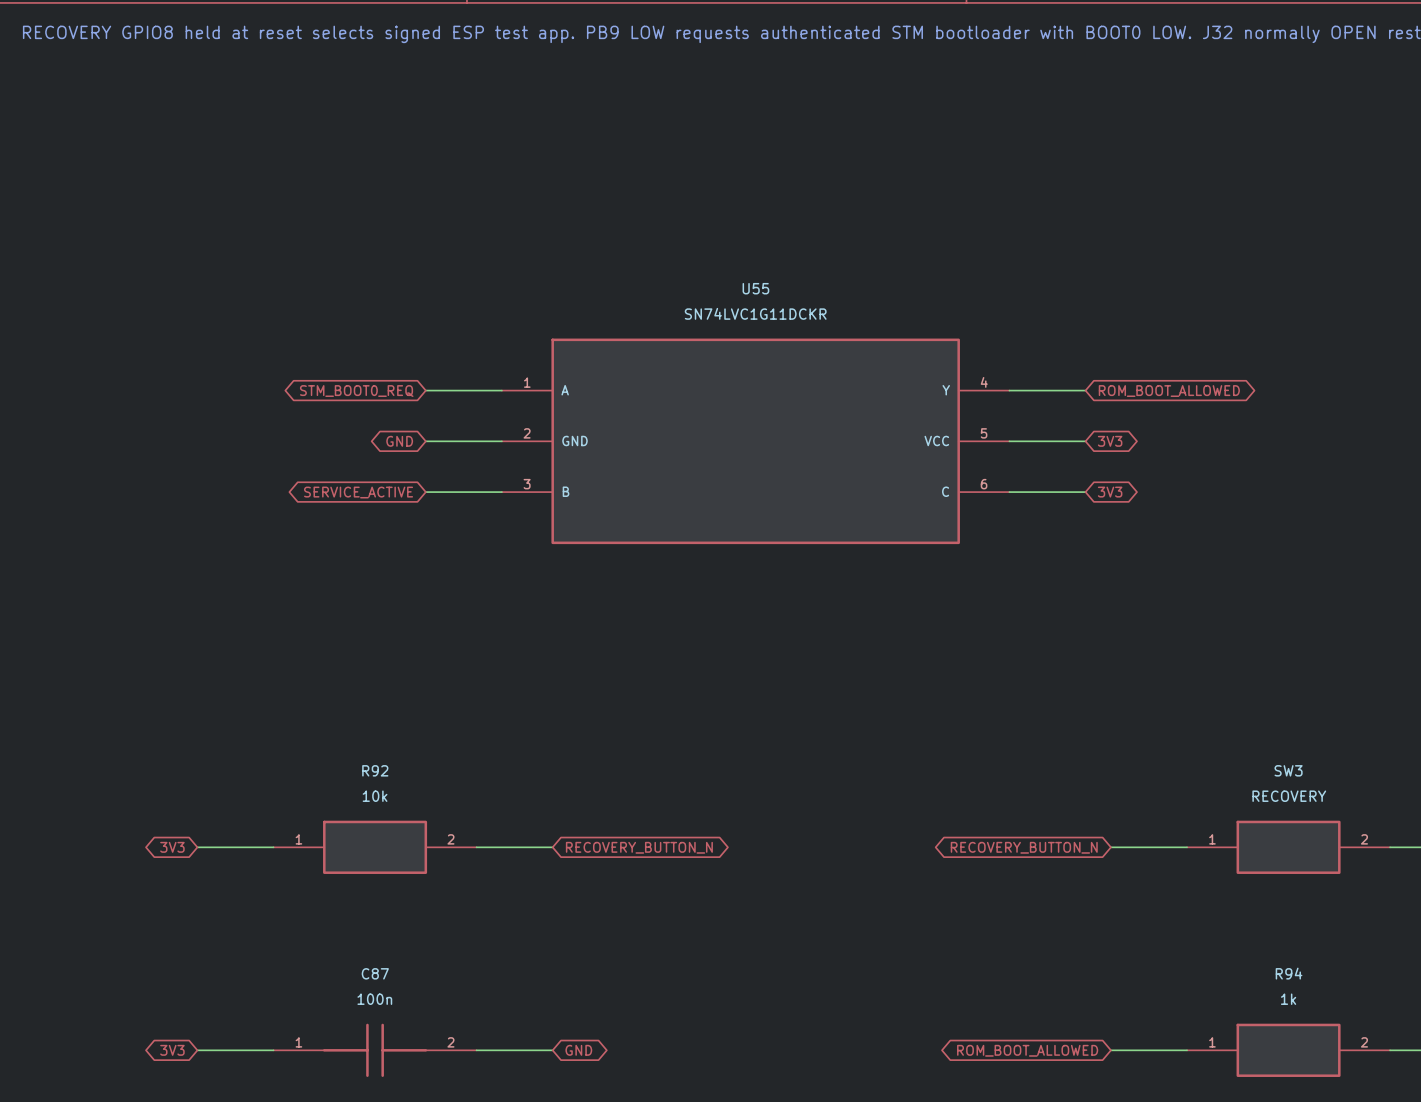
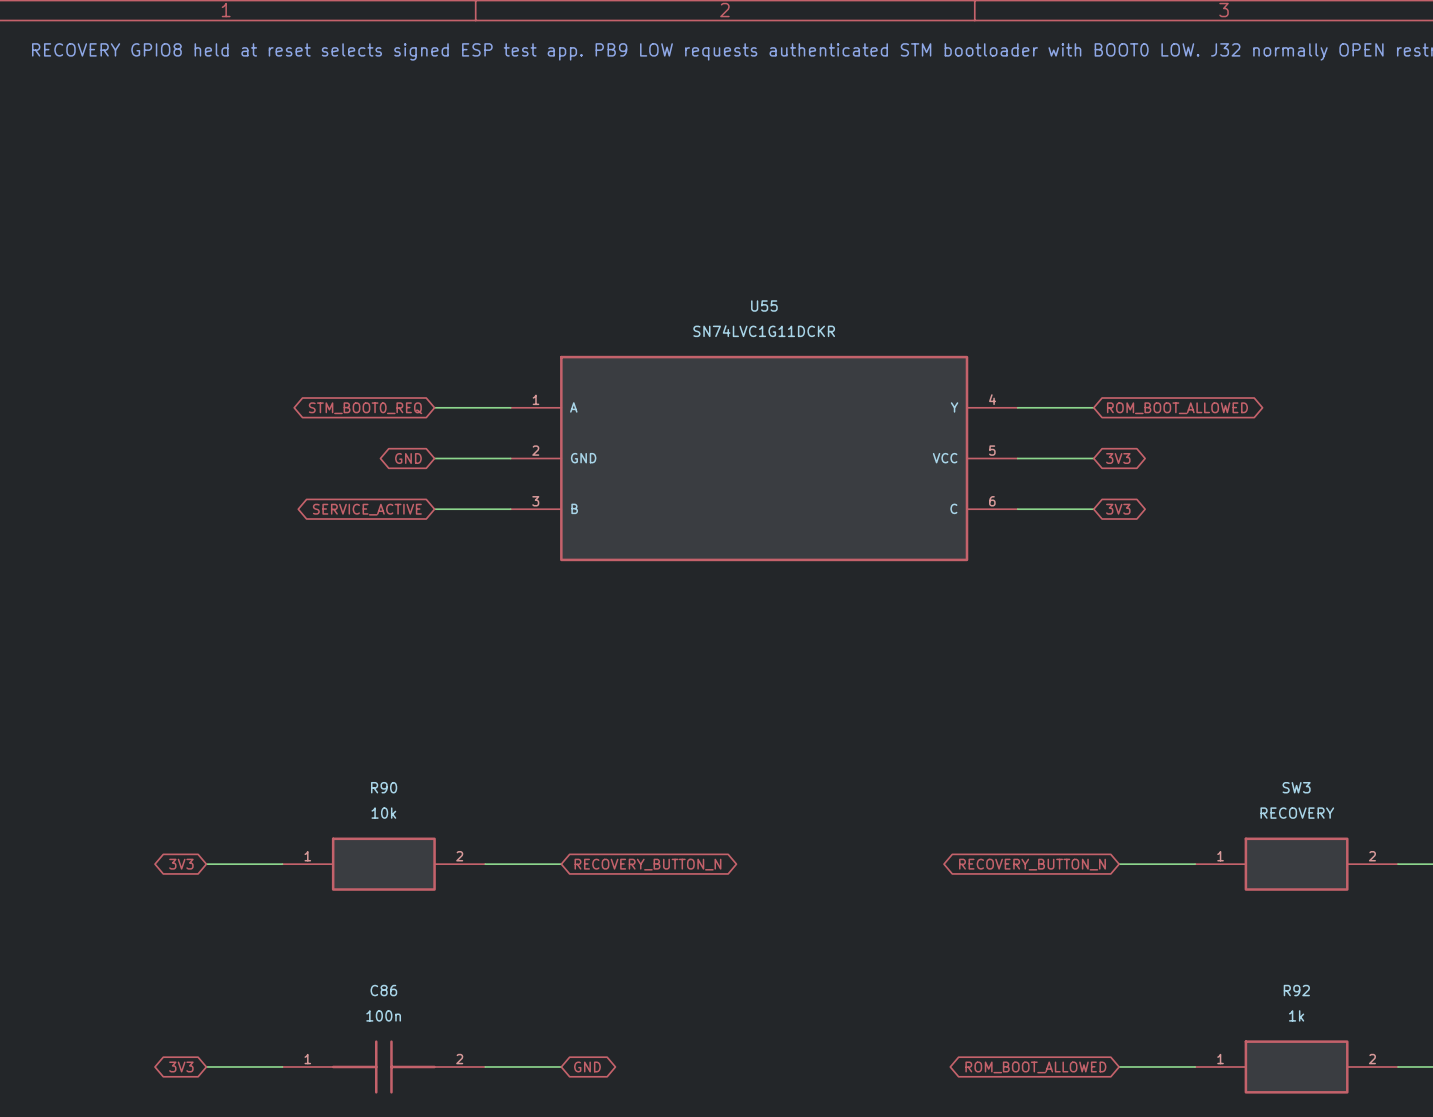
R92 name: R92 (375, 770) -> R90 (384, 787)
C87 name: C87 (375, 973) -> C86 (383, 990)
R94 name: R94 (1289, 973) -> R92 (1296, 990)

